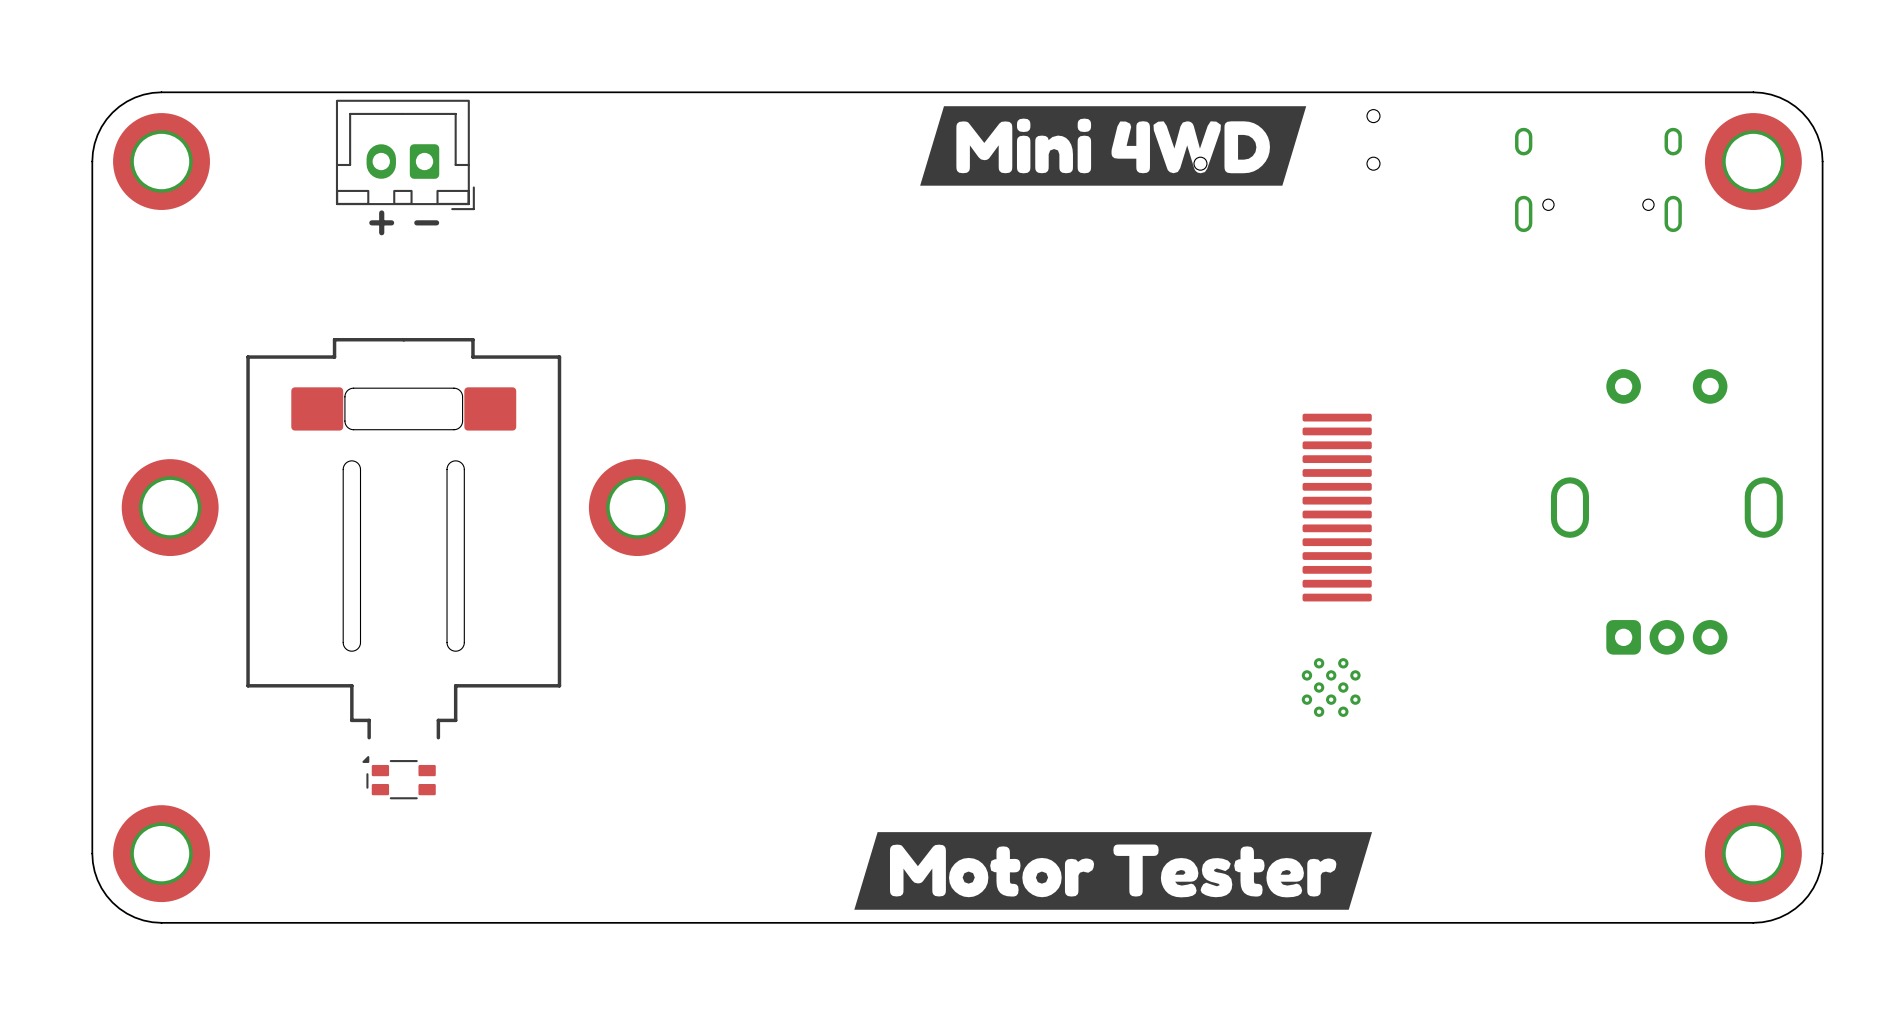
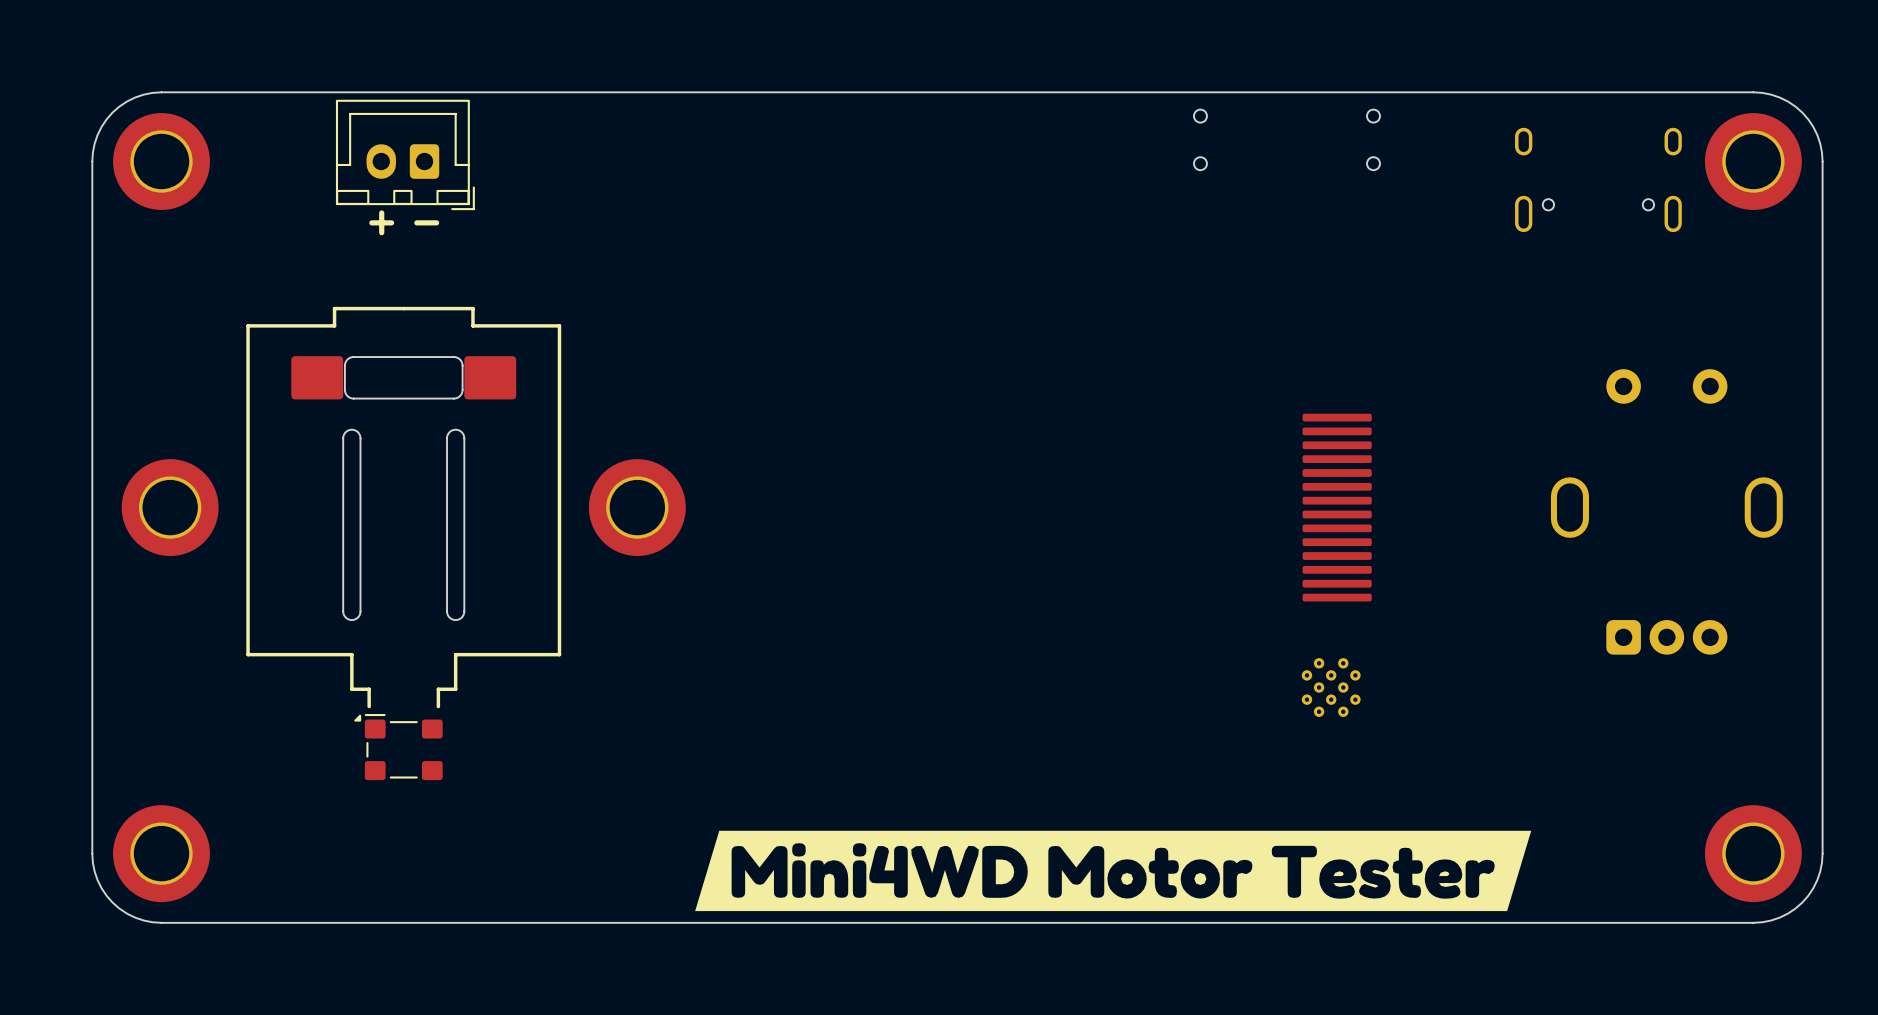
drawing: [920, 106, 1307, 186] -> none
board edge: (343, 469) (345, 463) (351, 460) (357, 463) (360, 469) -> (343, 469) (343, 436) (346, 431) (351, 429) (357, 431) (360, 436) (360, 469)
board edge: (447, 469) (449, 463) (455, 460) (462, 463) (464, 469) -> (447, 469) (447, 436) (450, 431) (455, 429) (460, 431) (464, 436) (464, 469)
part position: (403, 538) -> (403, 507)
board edge: (343, 611) (343, 644) (346, 649) (351, 651) (357, 649) (360, 644) (360, 611) -> (343, 611) (345, 617) (351, 620) (357, 617) (360, 611)
board edge: (447, 611) (447, 644) (450, 649) (455, 651) (460, 649) (464, 644) (464, 611) -> (447, 611) (449, 617) (455, 620) (461, 617) (464, 611)
part: none -> (398, 747)
part: (399, 777) -> none
drawing shape: [854, 832, 1373, 910] -> [695, 830, 1532, 912]

